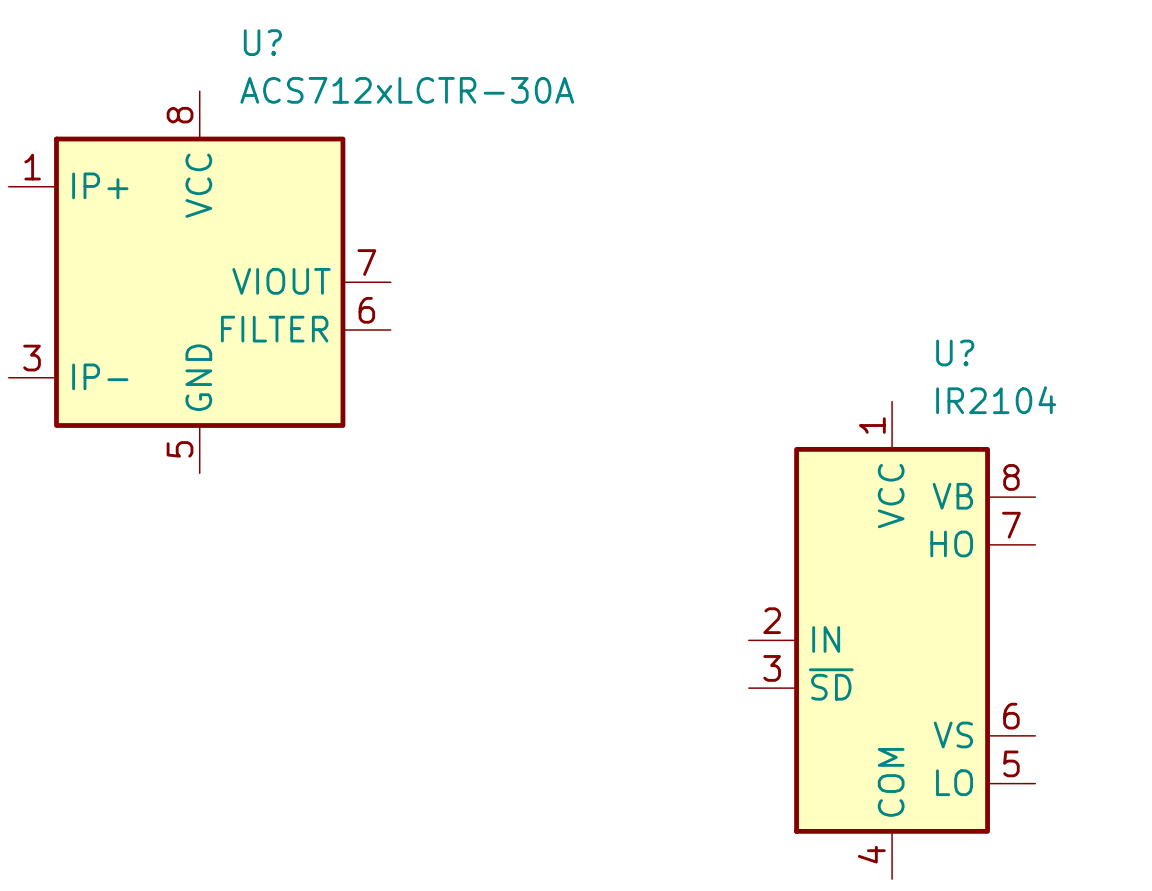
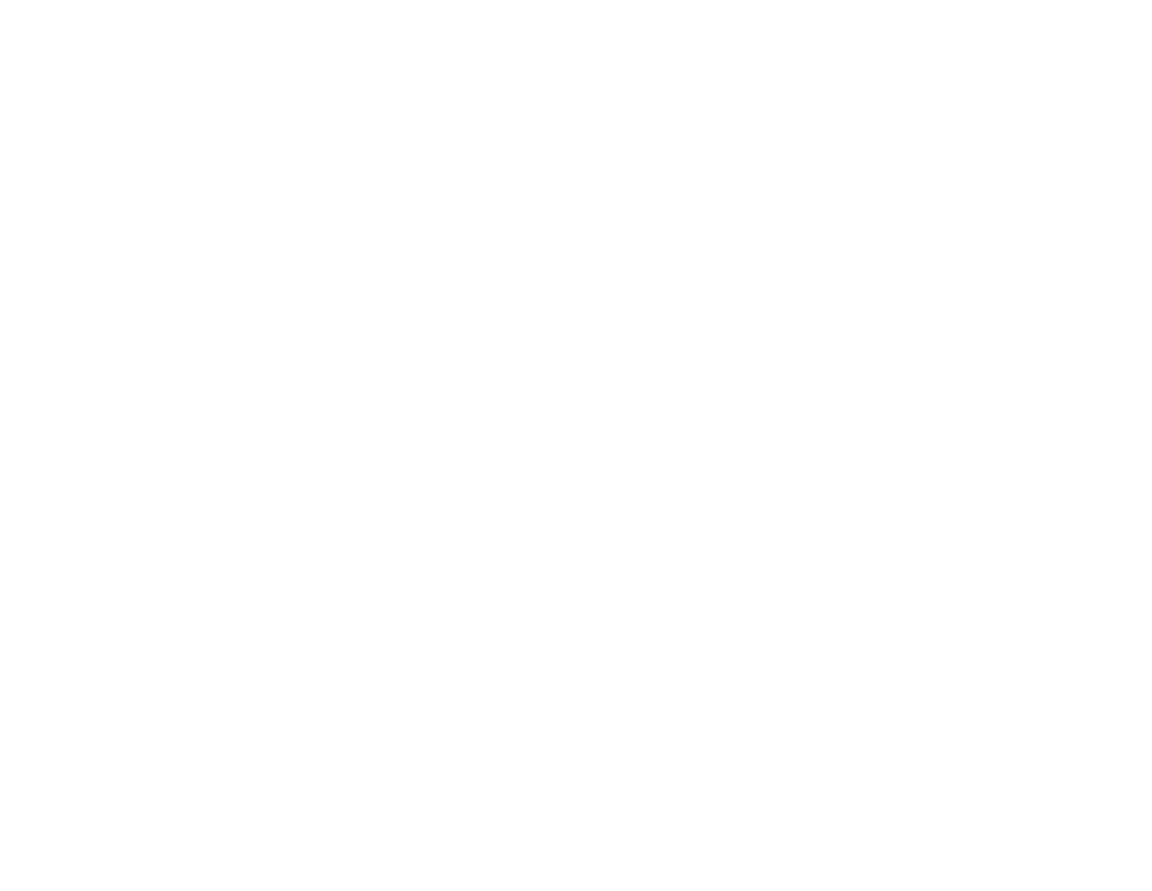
U?: ACS712xLCTR-30A (199, 282) -> none
U?: IR2104 (892, 640) -> none

